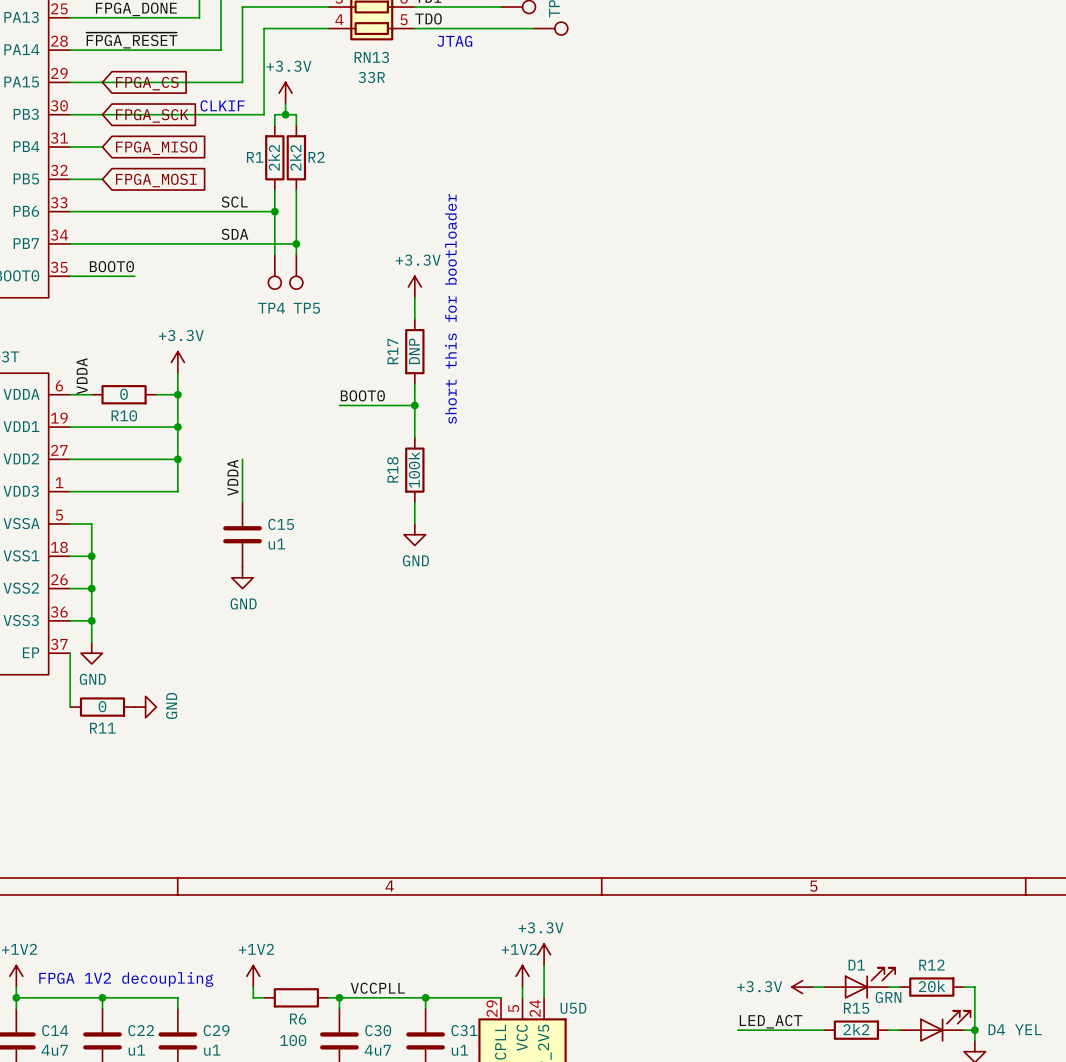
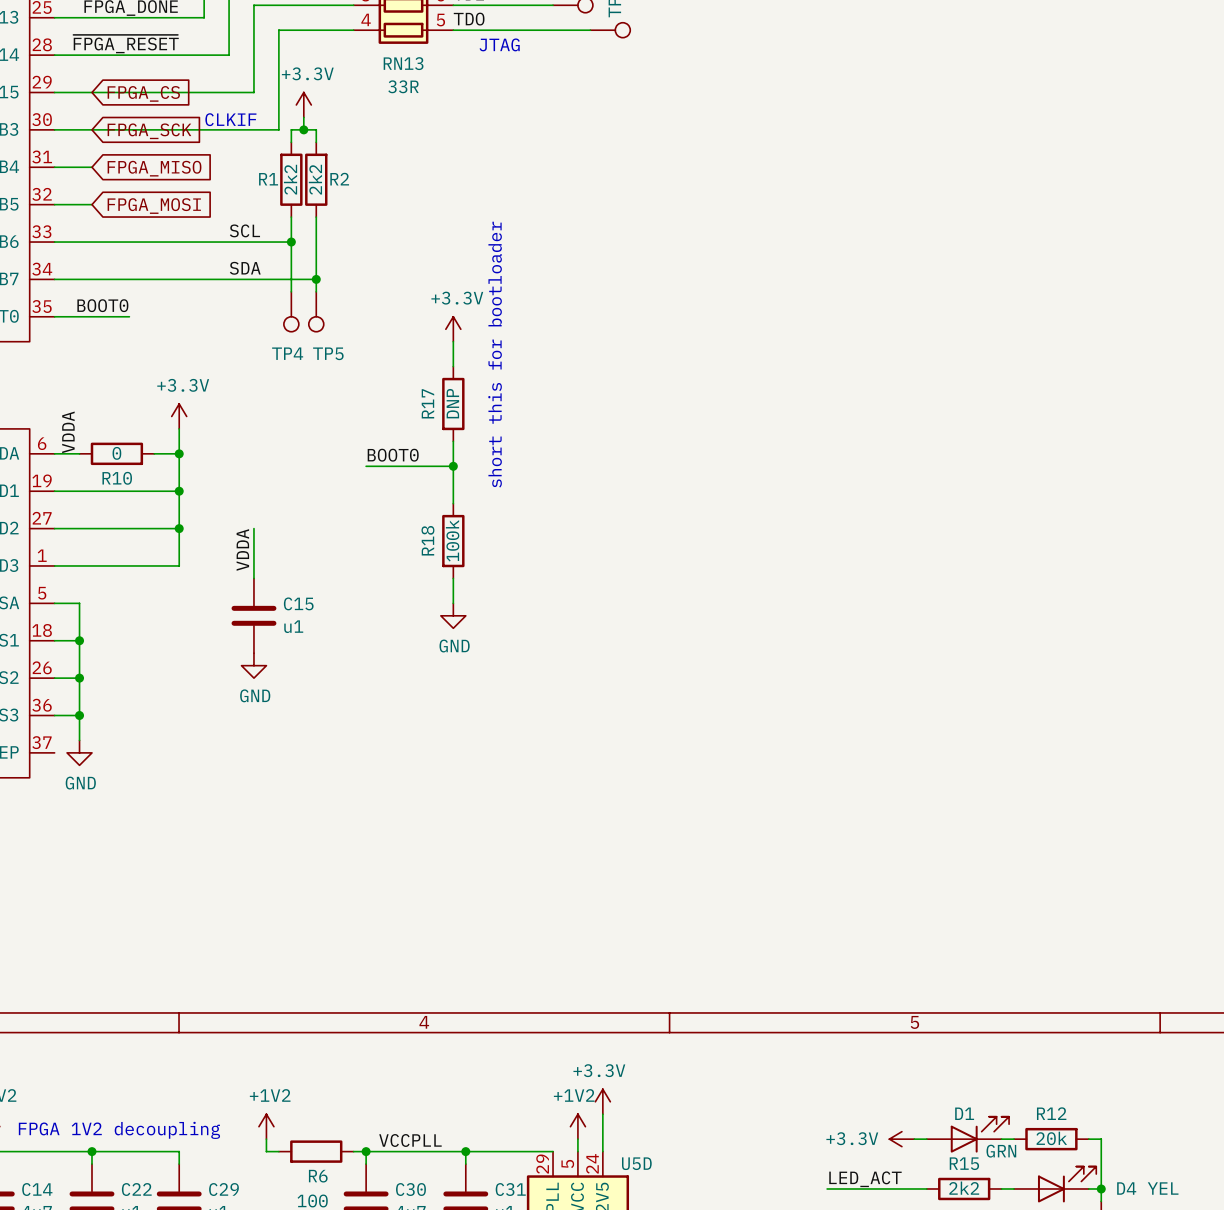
wire: (70, 653) (70, 707) -> none
R11: 0 (102, 707) -> none
power symbol: GND (145, 707) -> none

